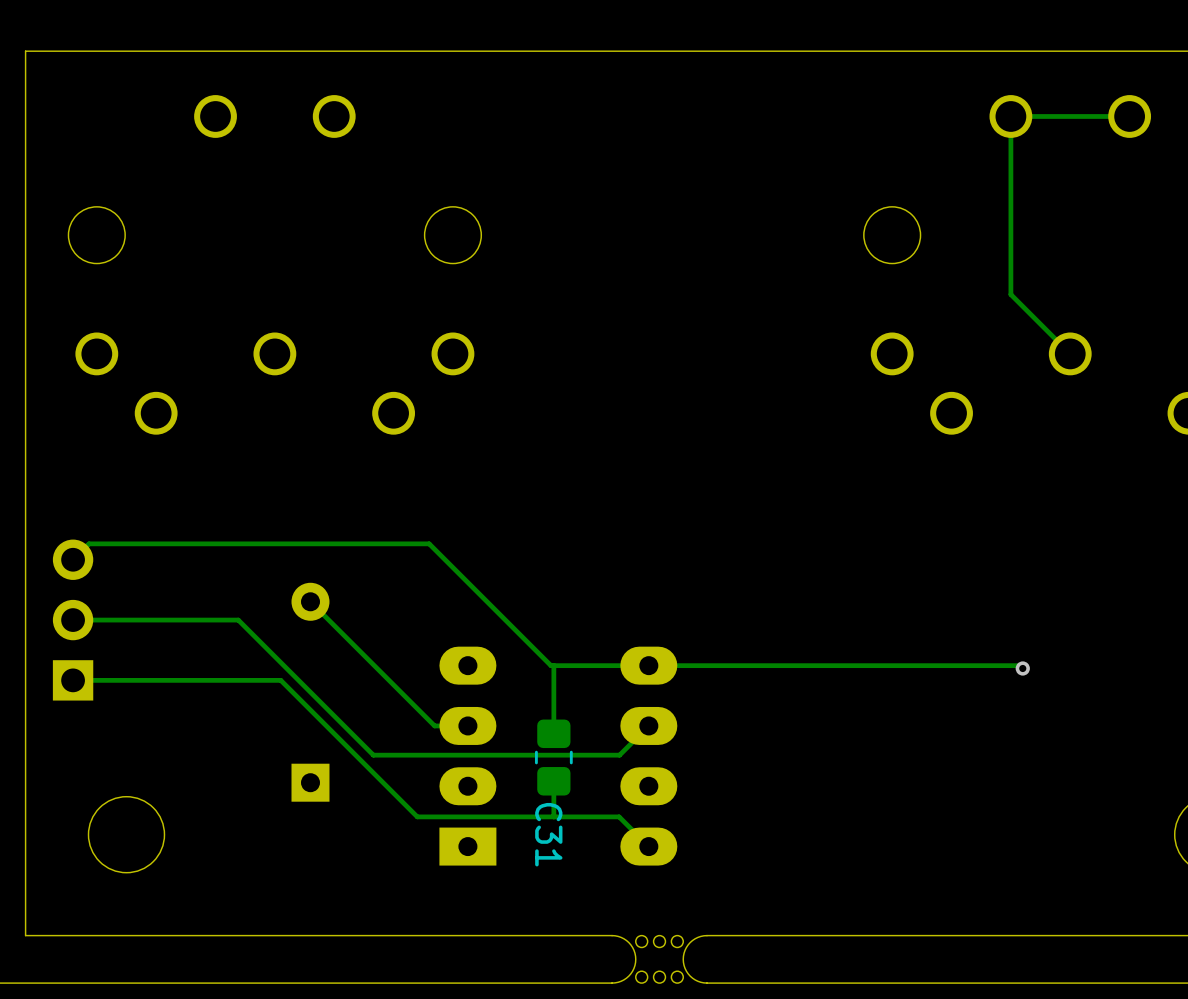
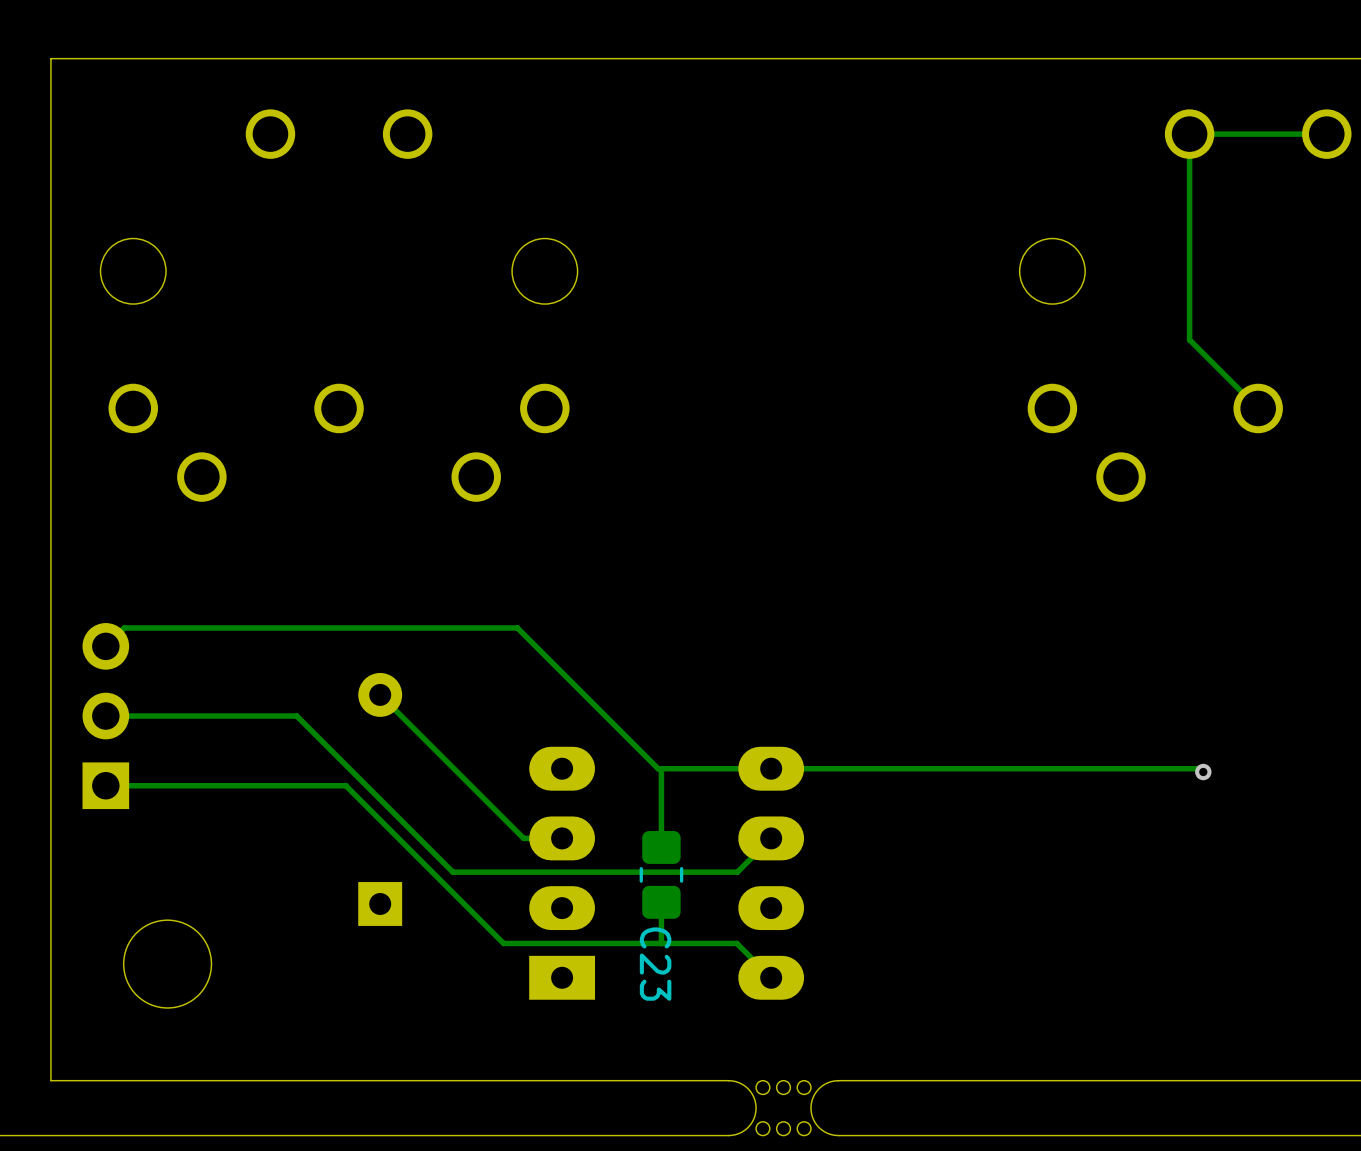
C31 name: C31 (548, 834) -> C23 (655, 964)

